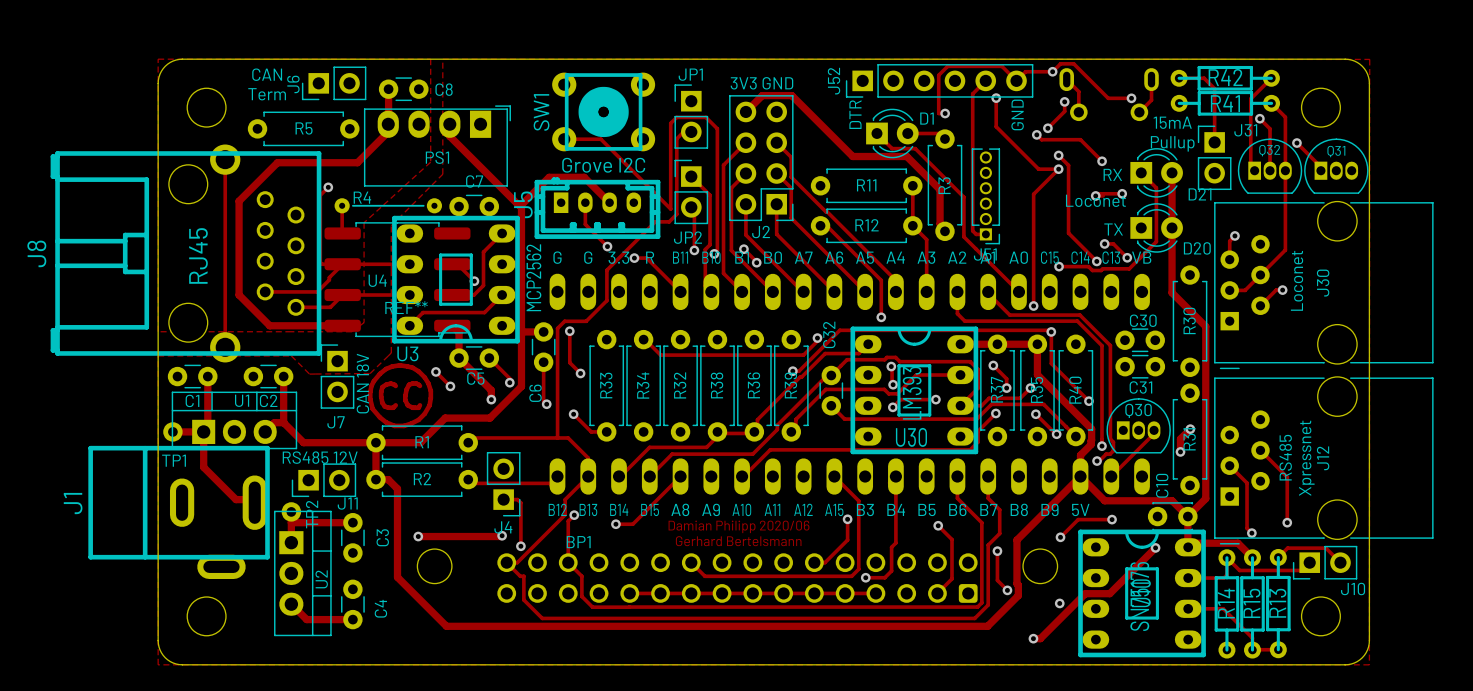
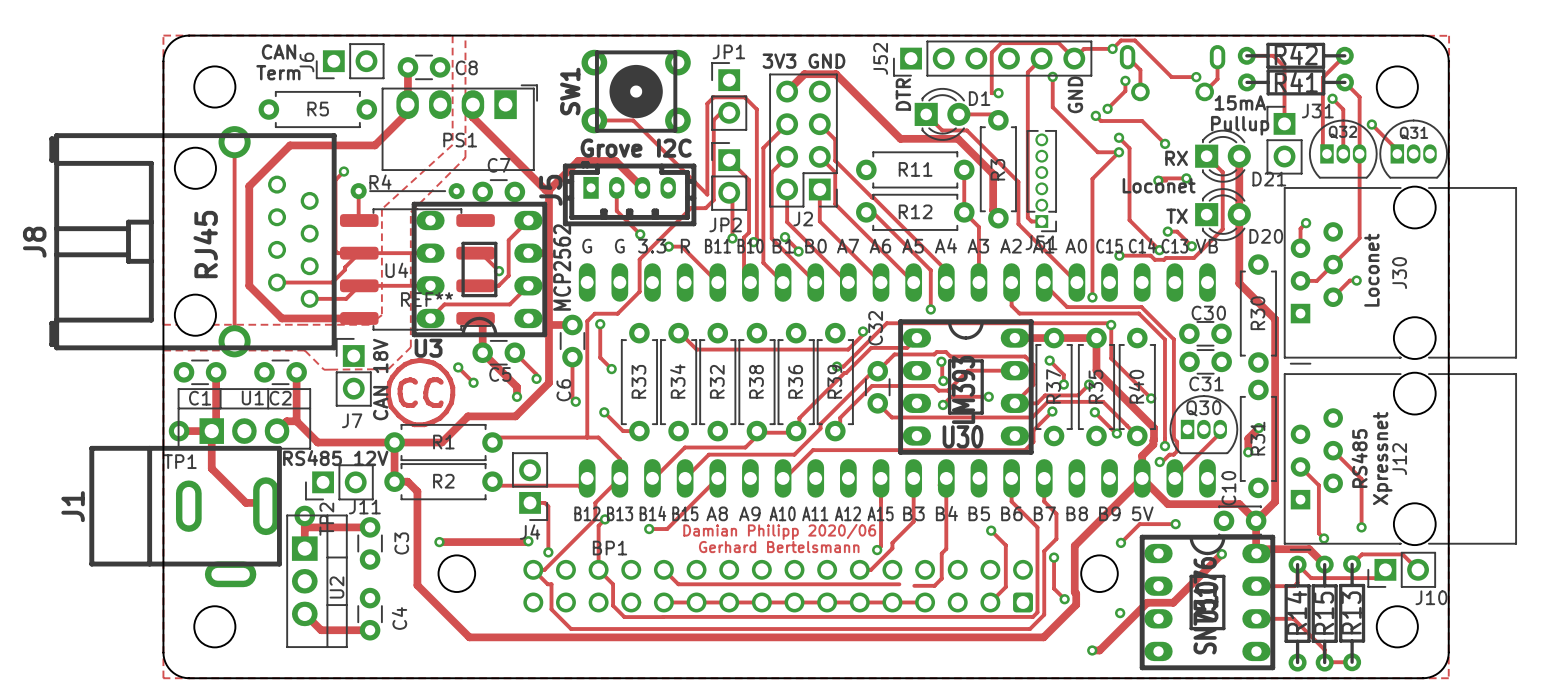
track: (834, 476) (858, 500) (858, 569) (851, 576) -> (881, 478) (881, 546) (877, 550)
track: (847, 519) (847, 540) (845, 542) -> (913, 478) (913, 521) (892, 542) (892, 548)
via: (847, 519) -> none
via: none -> (877, 550)
track: (691, 562) (704, 576) -> (663, 569) (678, 584) (743, 584)
via: (865, 577) -> none

